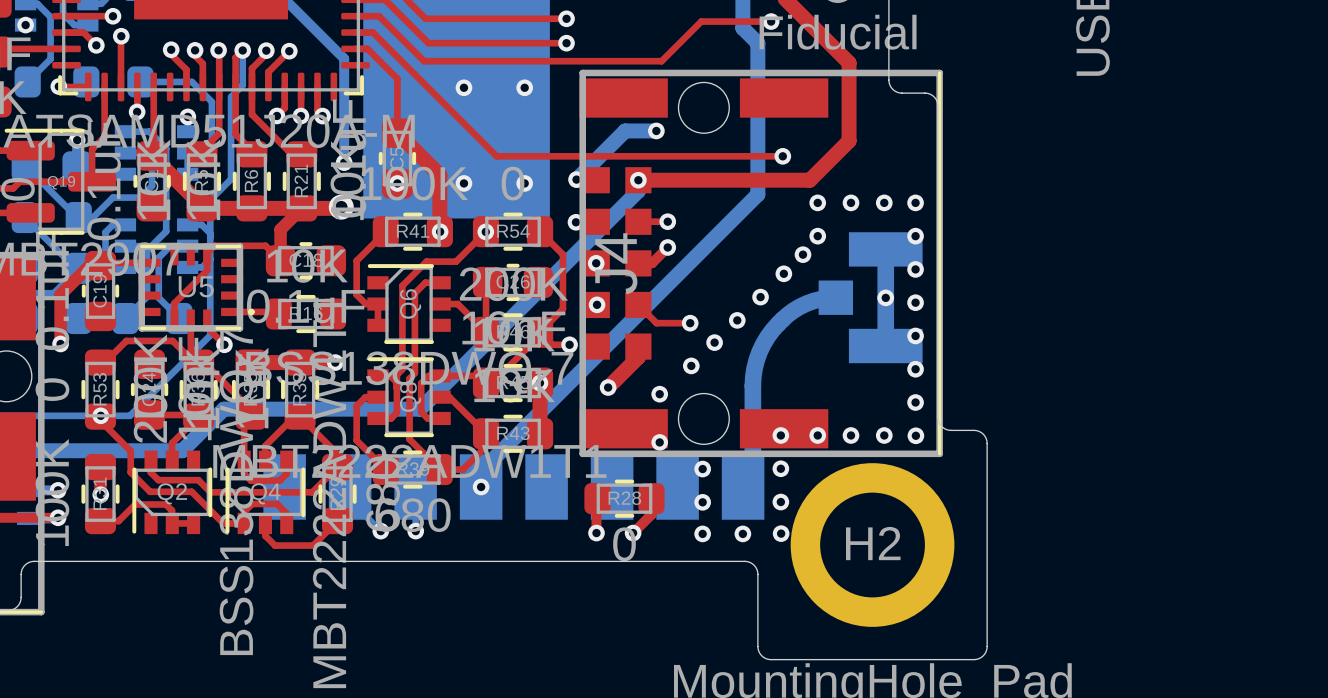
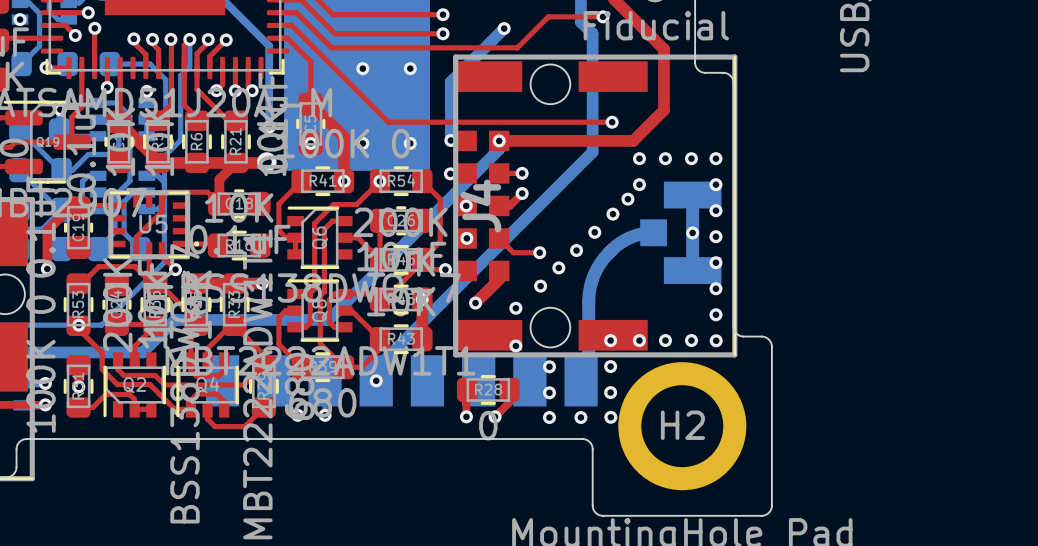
bottom track: (656, 130) (625, 130) (576, 179) -> (504, 28) (450, 81) (450, 140)
via position: (656, 130) -> (504, 28)

